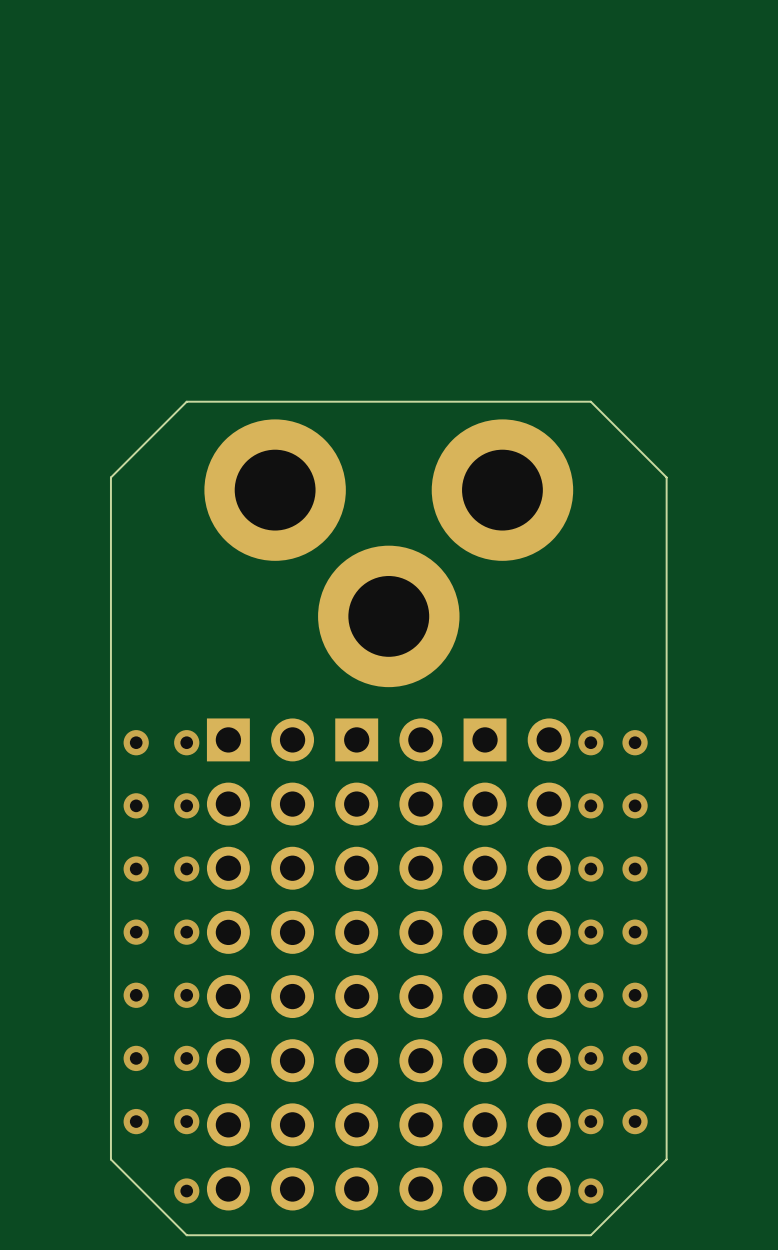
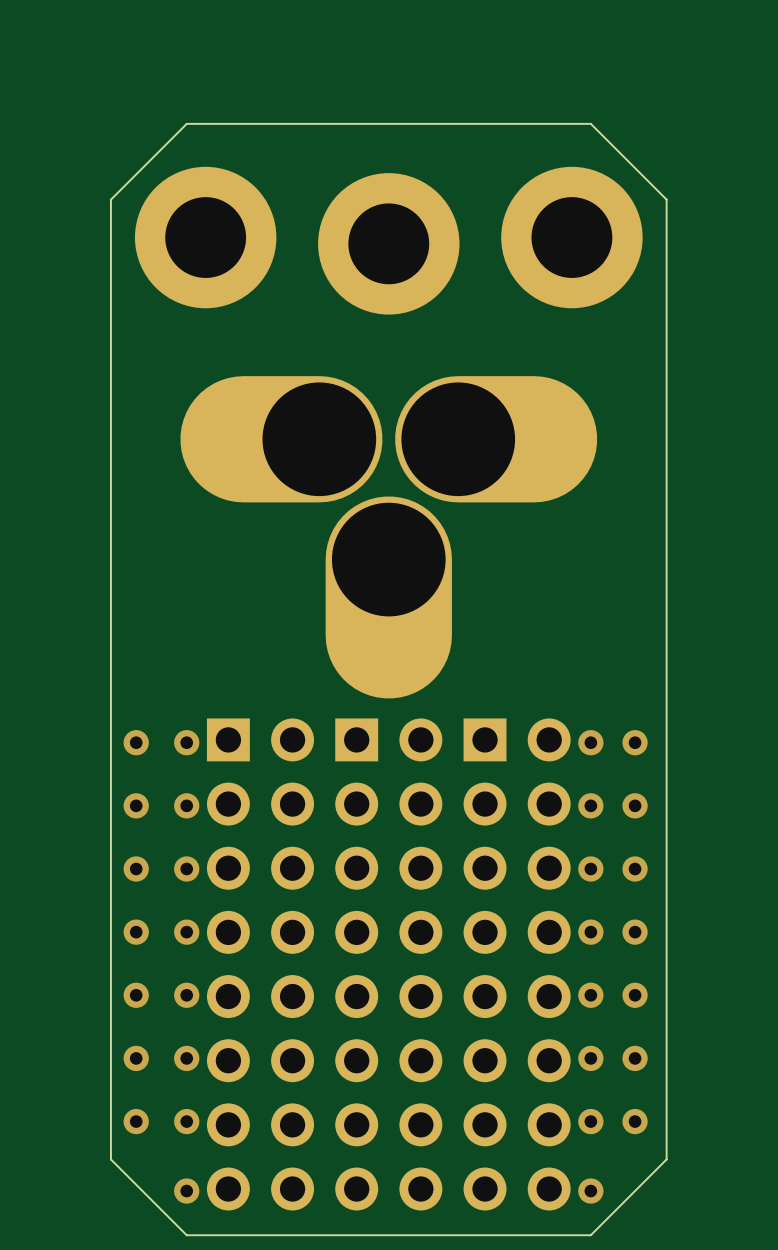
part: none -> (205, 237)
part: none -> (571, 237)
part: none -> (388, 243)
board edge: (666, 477) (590, 401) (186, 401) (110, 477) -> (666, 477) (666, 199) (590, 123) (186, 123) (110, 199) (110, 477)
part: (275, 490) -> none
part: (502, 490) -> none
part: none -> (388, 537)
part: (388, 616) -> none

